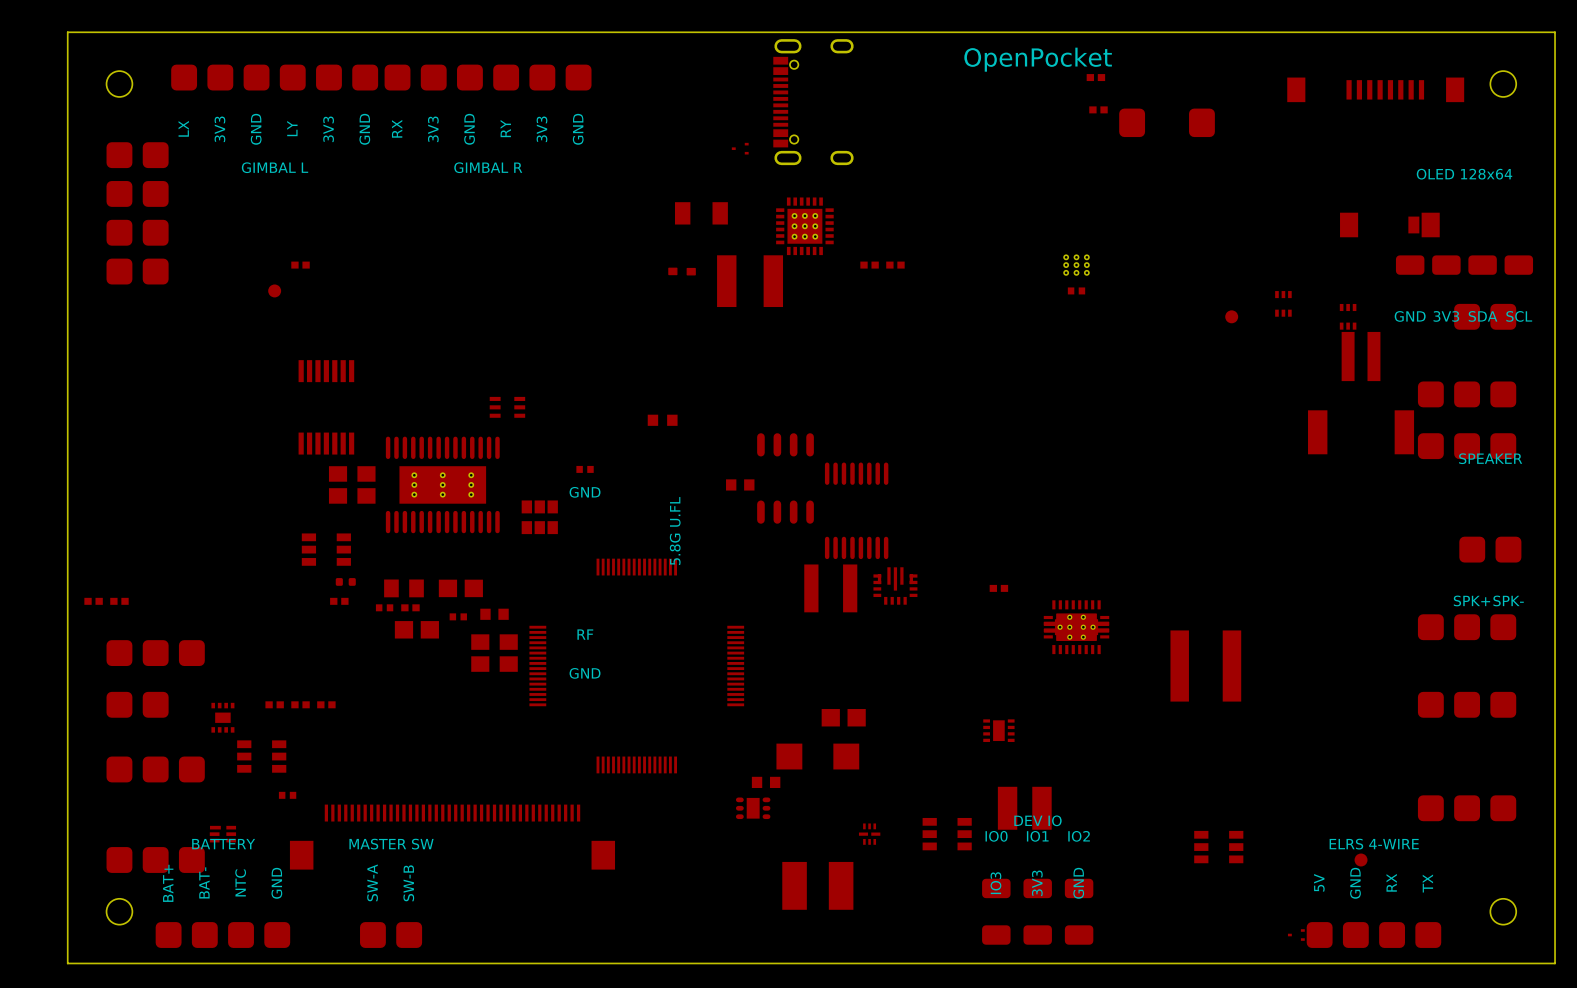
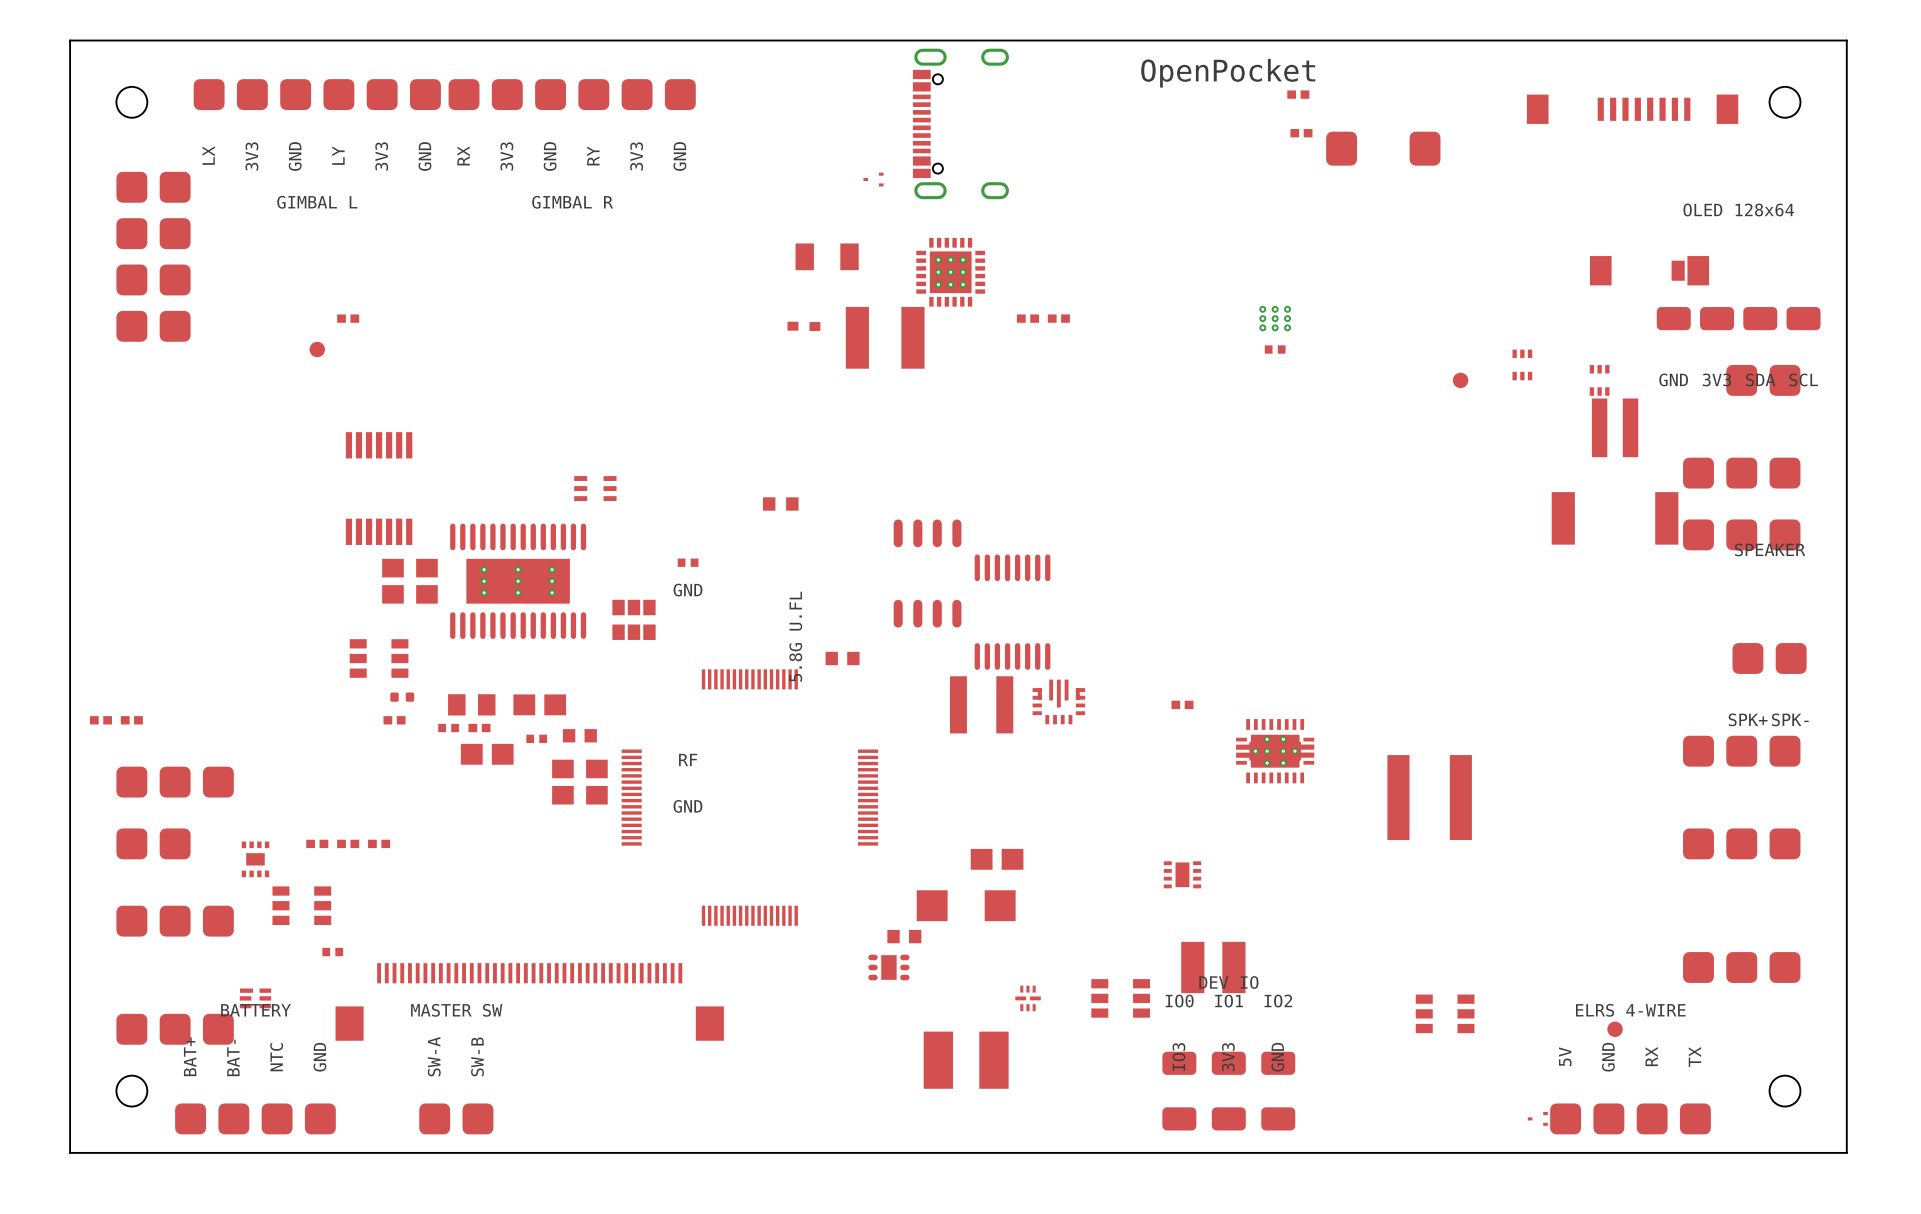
part position: (740, 484) -> (842, 658)

